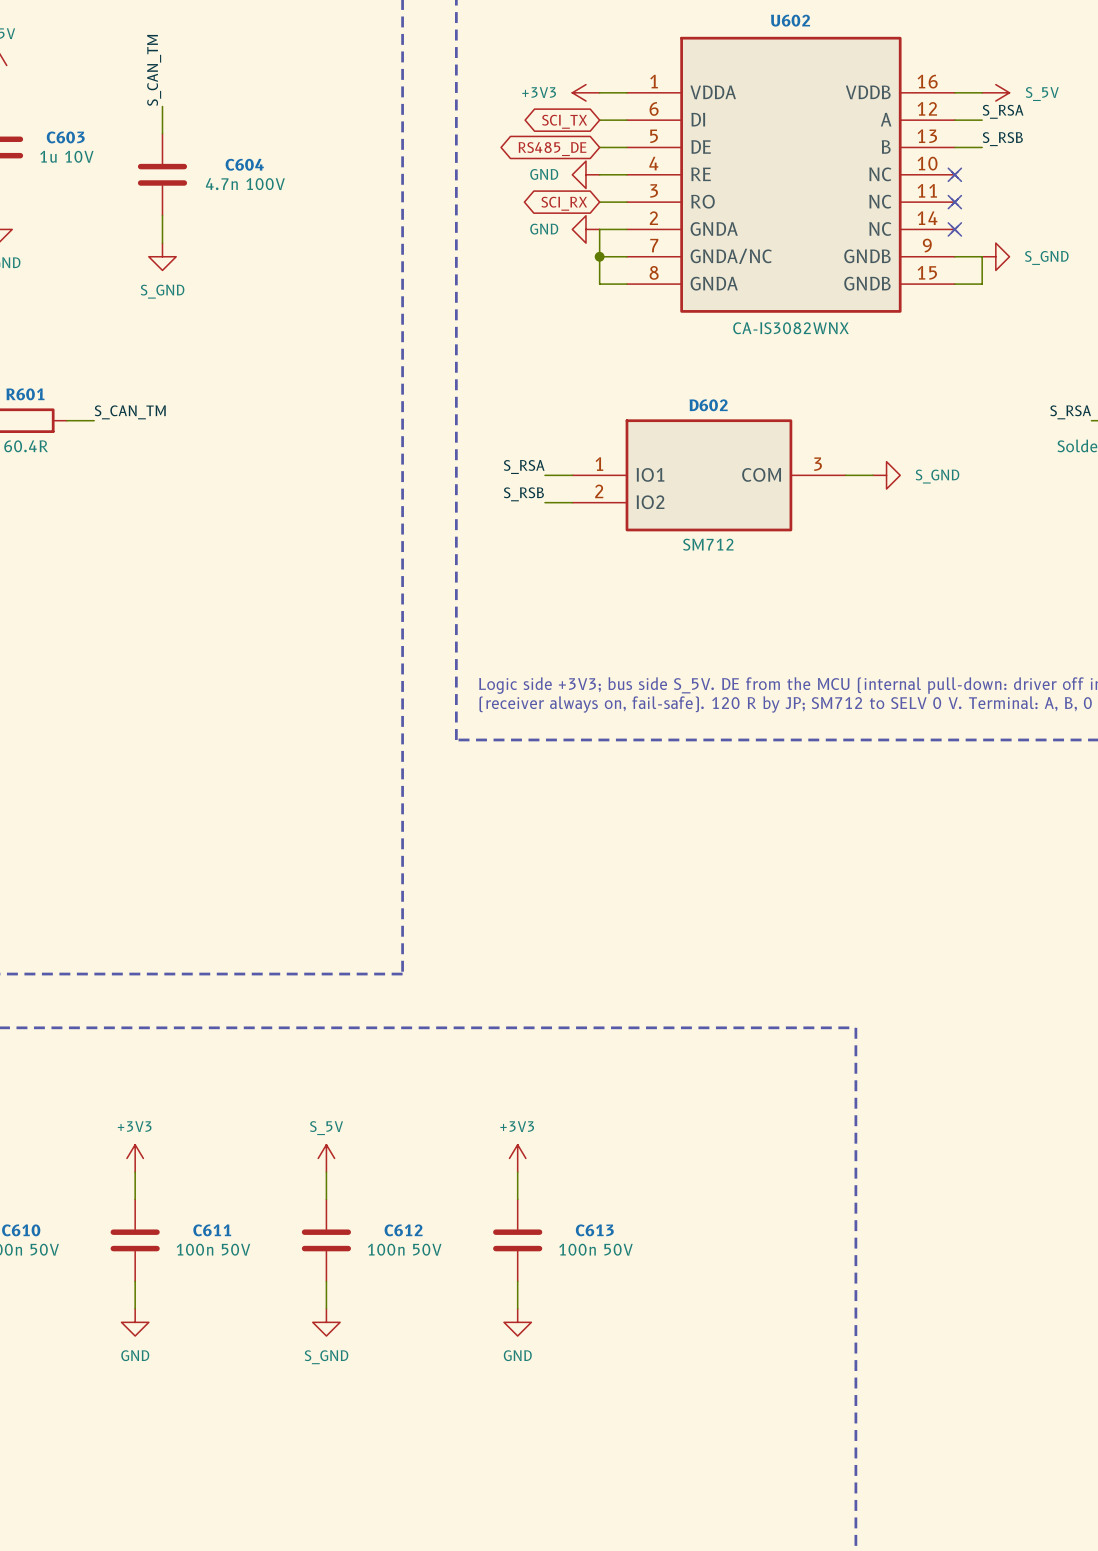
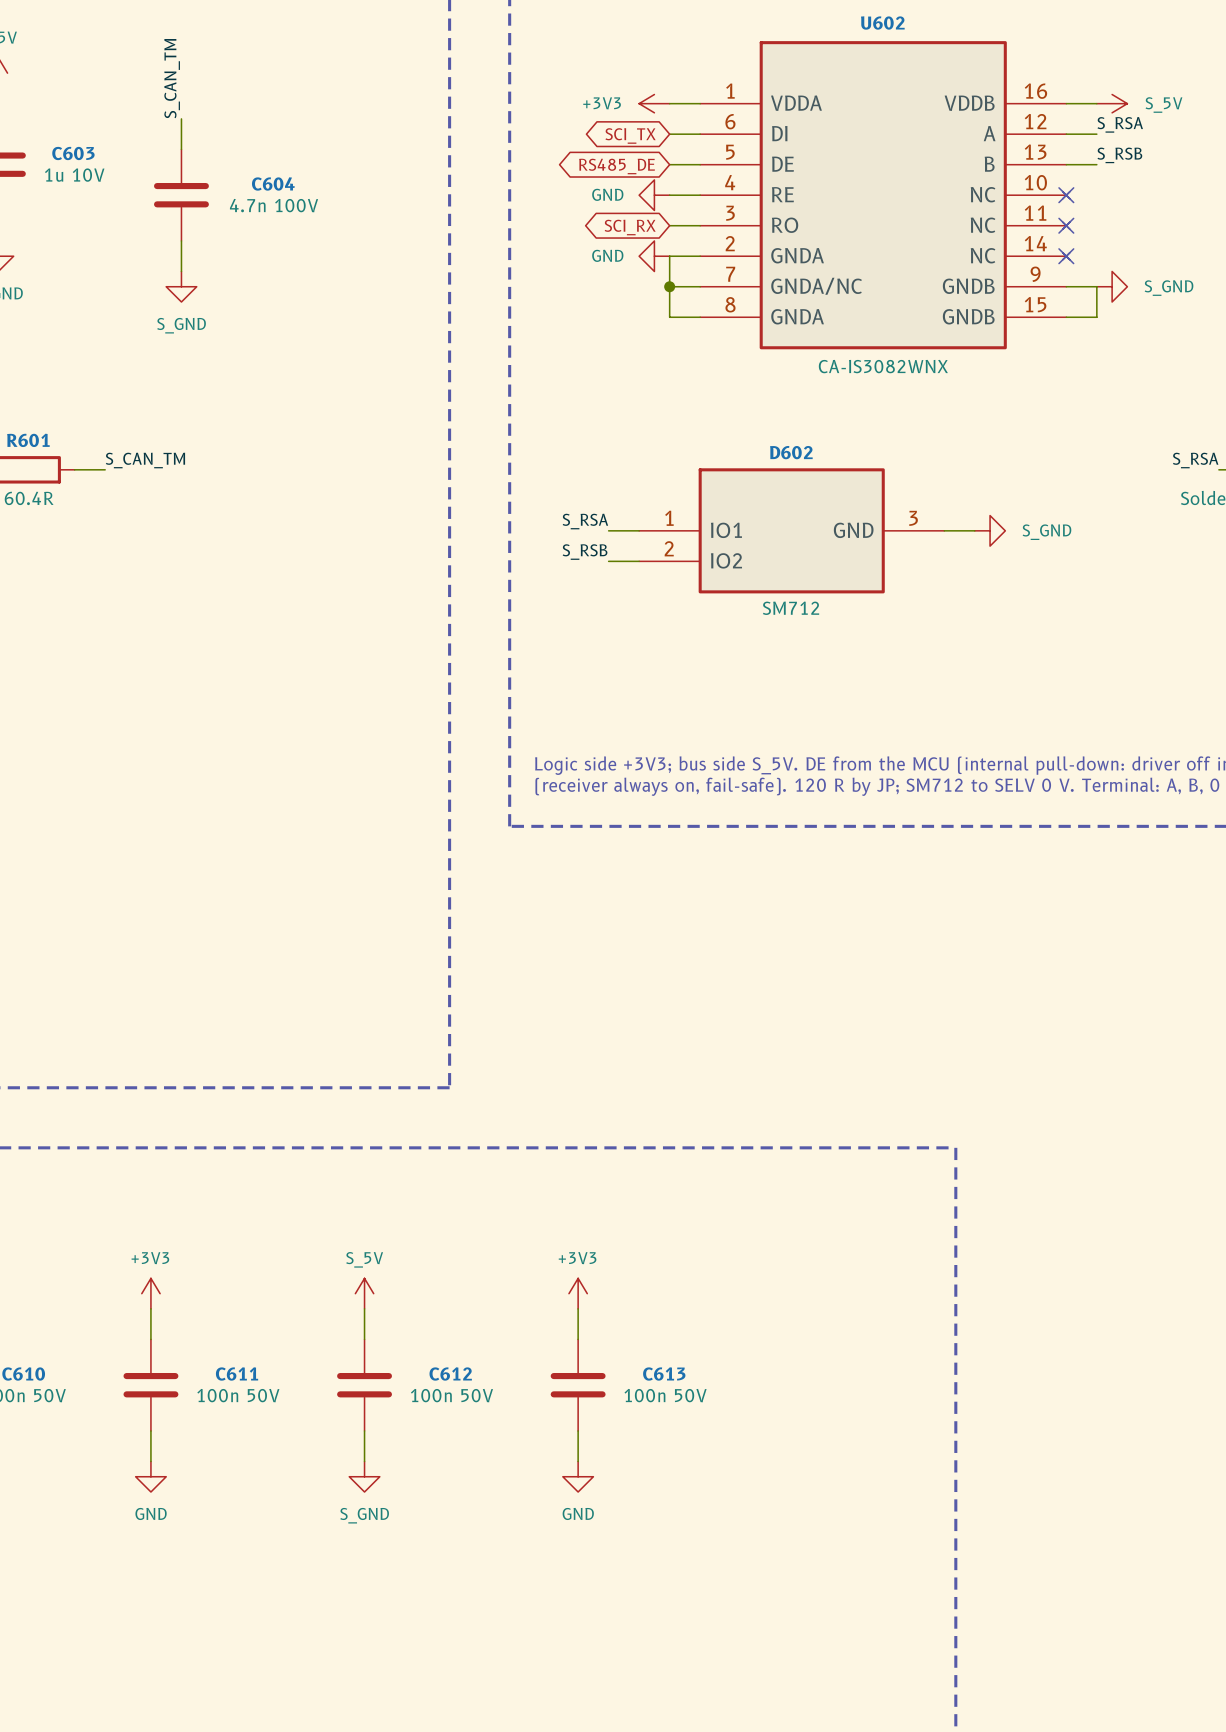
D602 pin name: COM (761, 474) -> GND (853, 530)

